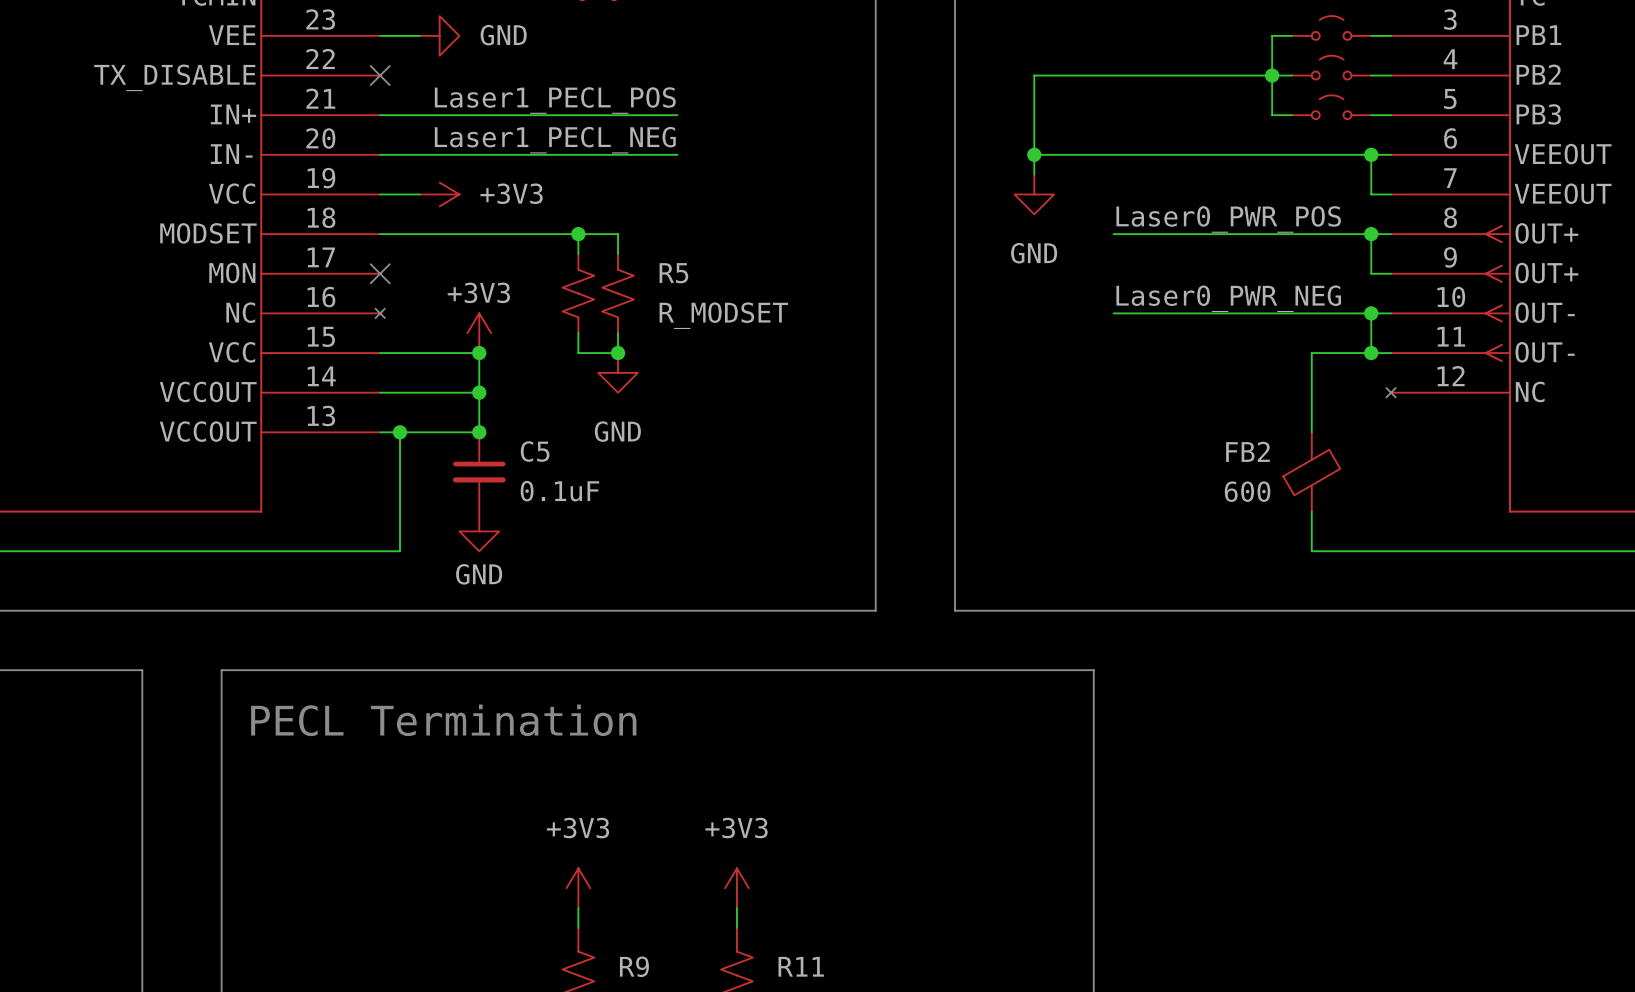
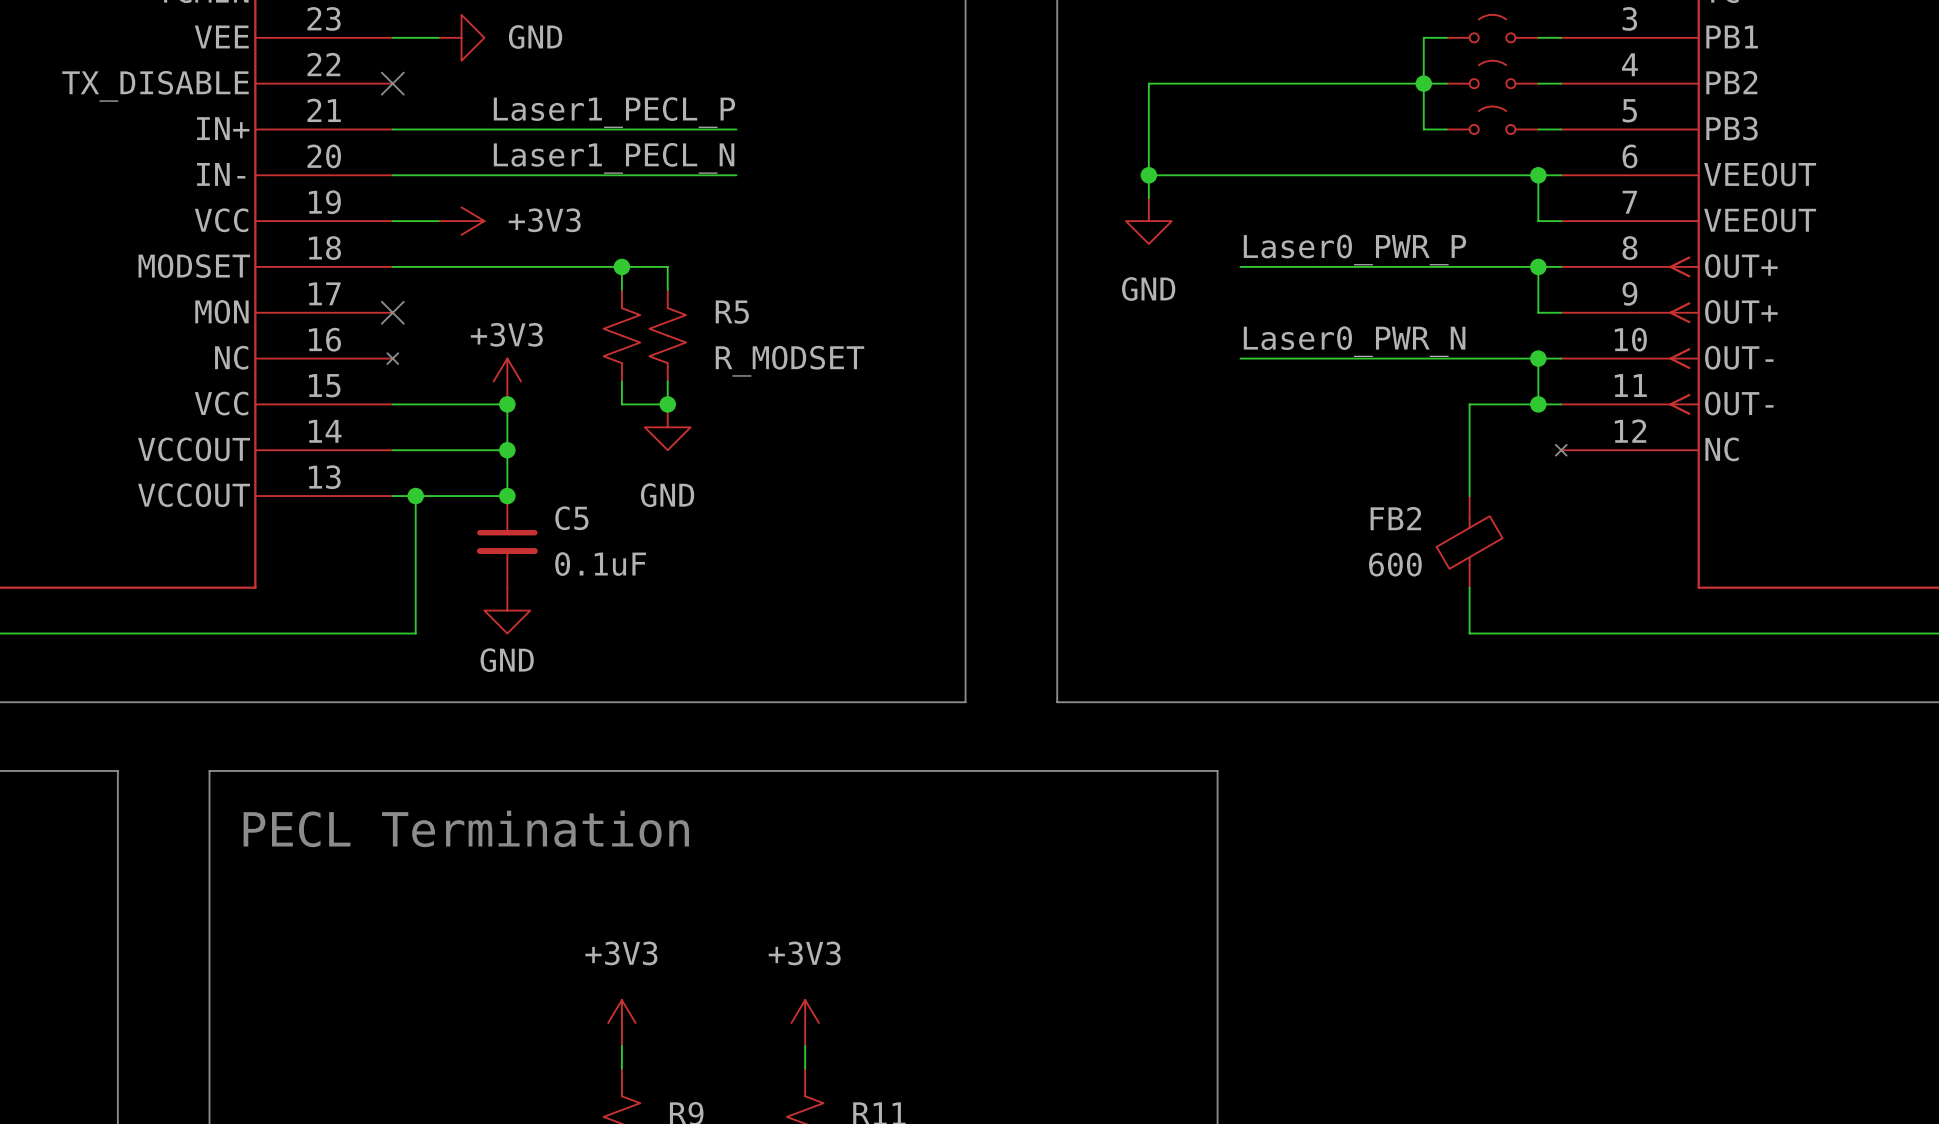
label: Laser1_PECL_POS (555, 100) -> Laser1_PECL_P (614, 112)
label: Laser1_PECL_NEG (555, 140) -> Laser1_PECL_N (614, 158)
label: Laser0_PWR_POS (1228, 219) -> Laser0_PWR_P (1354, 249)
label: Laser0_PWR_NEG (1228, 298) -> Laser0_PWR_N (1354, 341)

